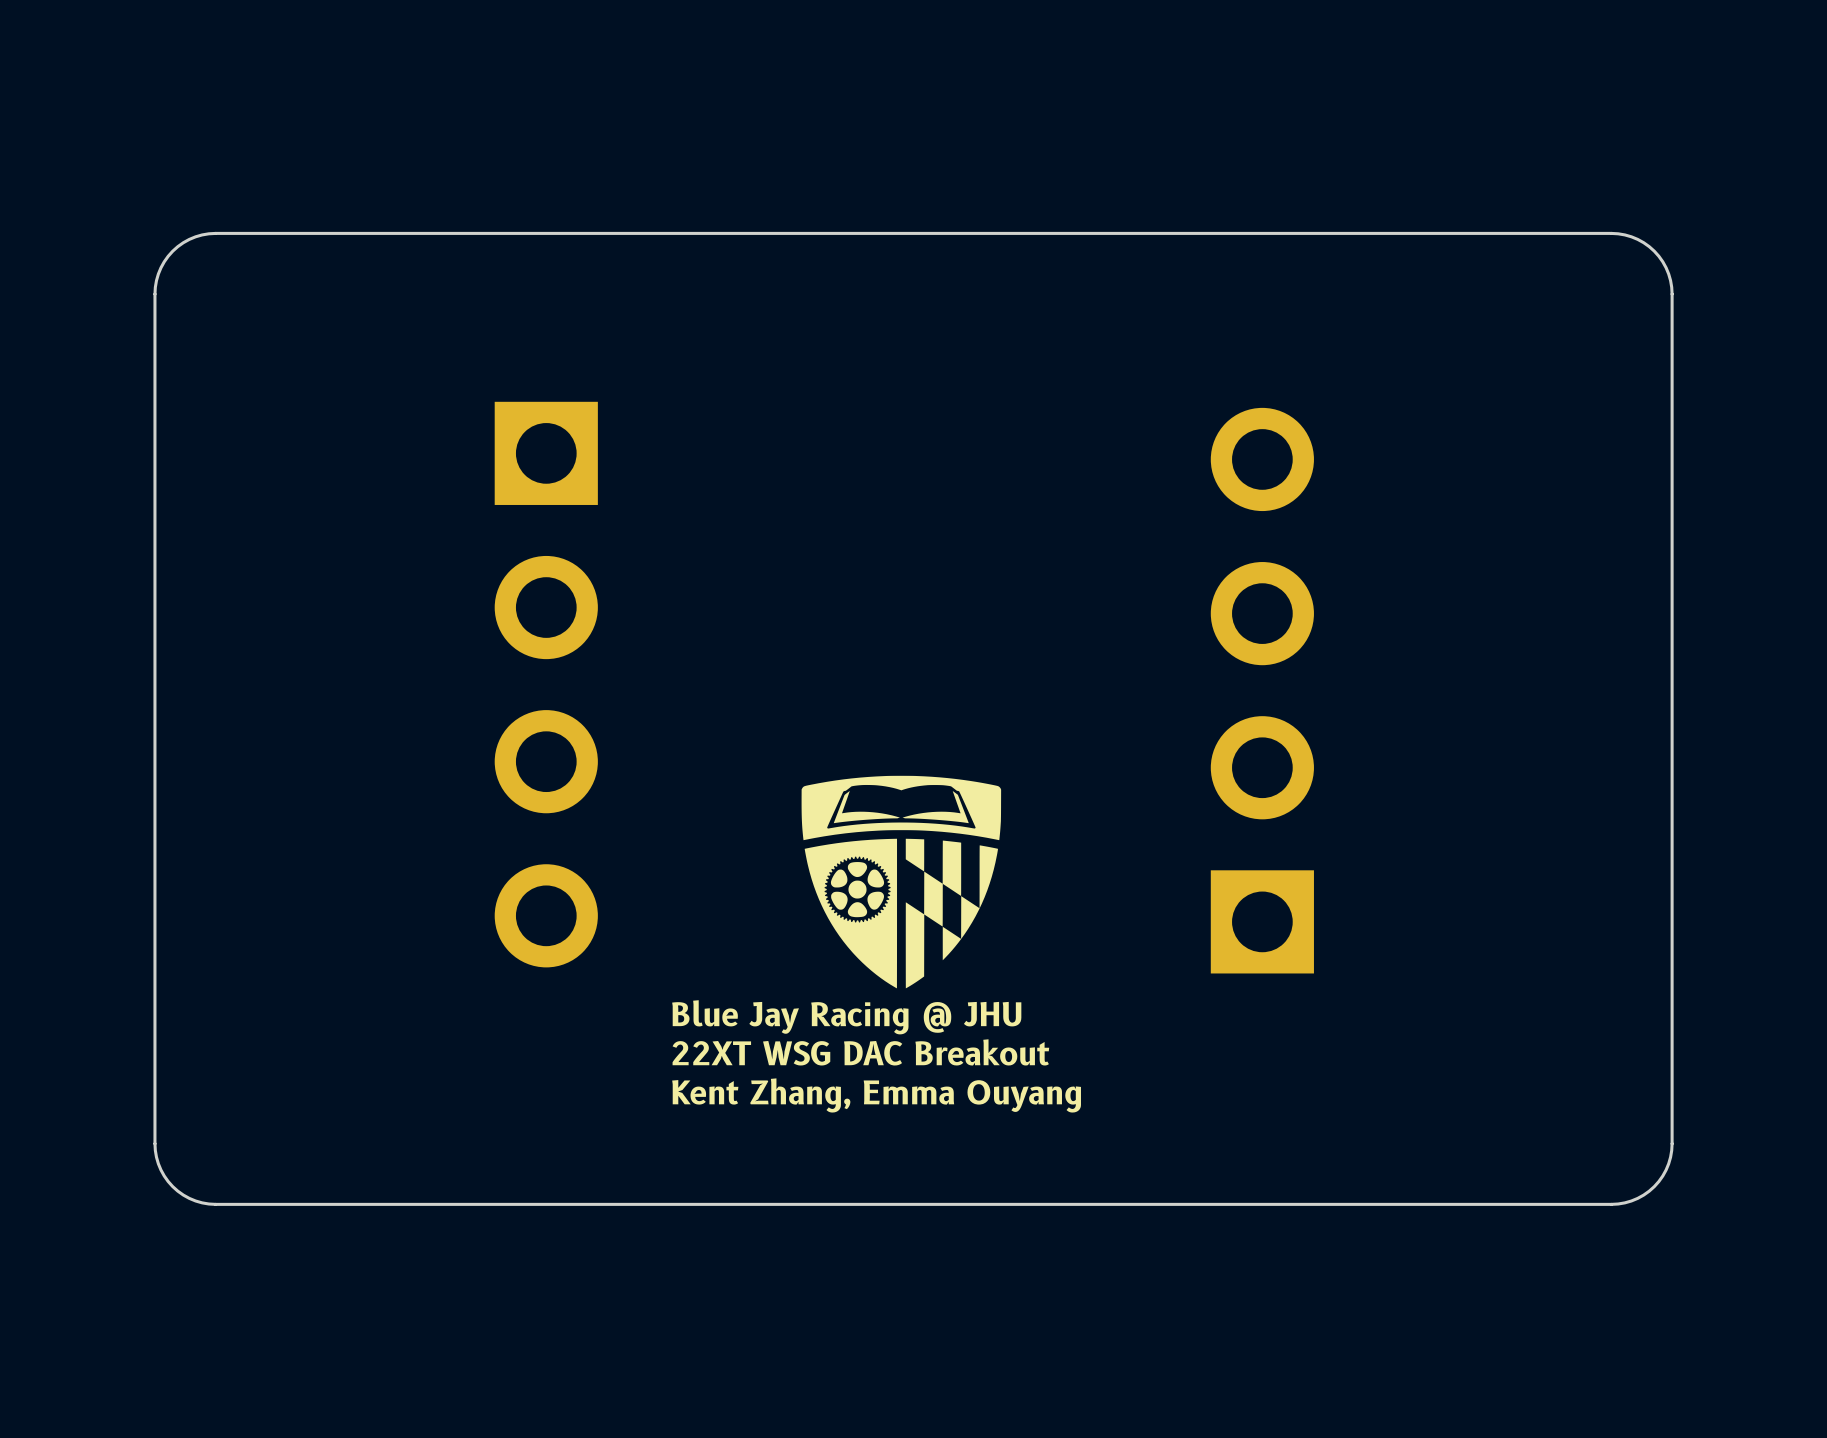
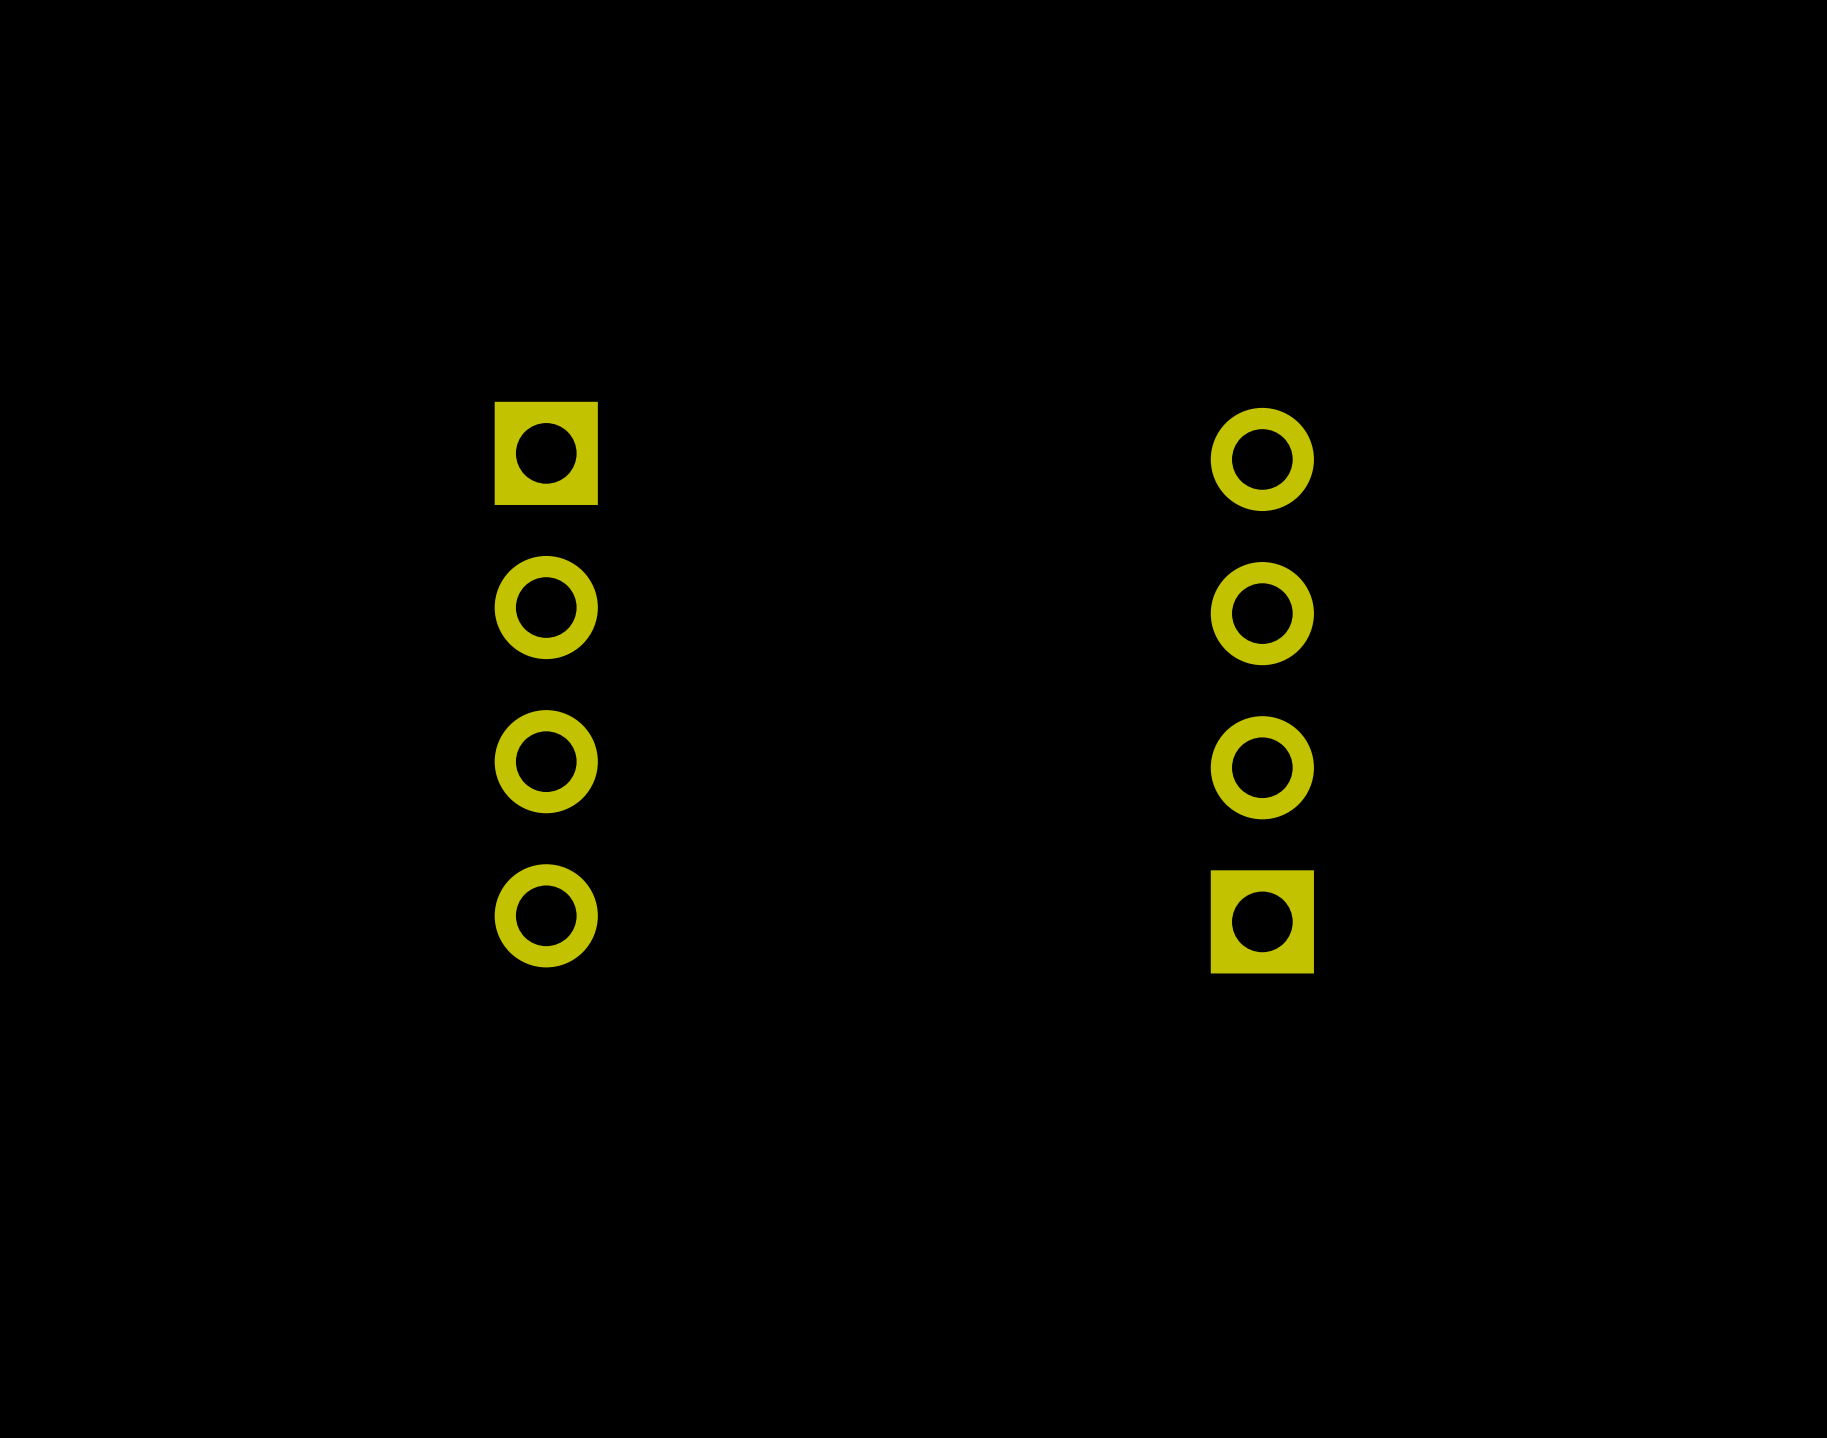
board edge: (1611, 233) (215, 233) (195, 236) (183, 242) (172, 251) (160, 267) (156, 280) (154, 294) (154, 1143) (158, 1163) (164, 1175) (172, 1186) (189, 1198) (202, 1202) (215, 1204) (1611, 1204) (1631, 1200) (1643, 1195) (1654, 1186) (1666, 1170) (1670, 1157) (1672, 1143) (1672, 294) (1670, 280) (1666, 267) (1654, 251) (1637, 239) (1624, 234) (1611, 233) -> none
drawing: [801, 775, 1002, 989] -> none
text: Blue Jay Racing @ JHU (846, 1017) -> none
text: 22XT WSG DAC Breakout (860, 1052) -> none
text: Kent Zhang, Emma Ouyang (876, 1095) -> none

